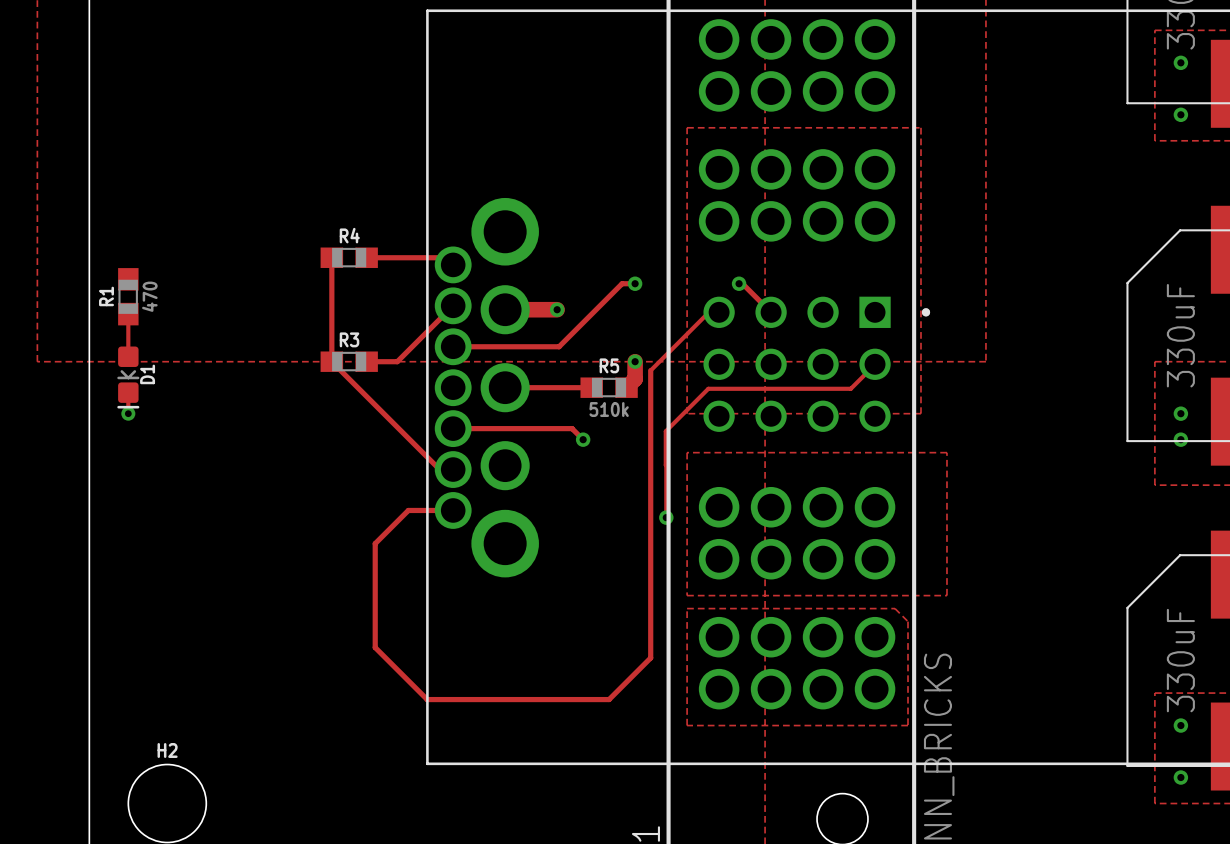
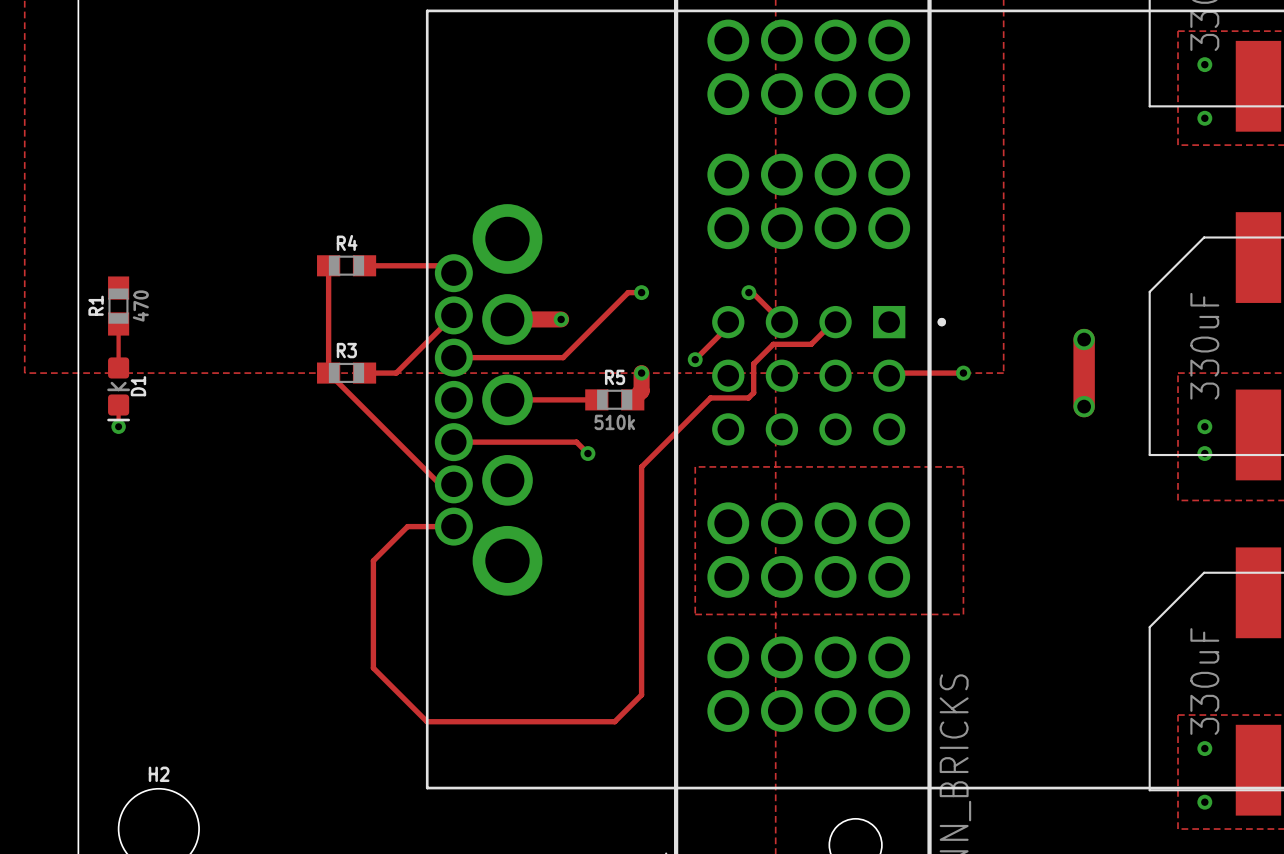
zone outline: (687, 127) (687, 413) (920, 413) (920, 127) (687, 127) -> none
track: none -> (728, 319) (728, 326) (695, 359)
track: (719, 312) (708, 312) (650, 370) (650, 657) (635, 673) -> (836, 319) (811, 344) (773, 344) (753, 363) (753, 392) (748, 397) (710, 397) (641, 466) (641, 694)
track: none -> (1084, 339) (1084, 406)
via: none -> (1084, 339)
via: none -> (695, 359)
track: none -> (889, 373) (963, 373)
via: none -> (963, 373)
track: (872, 366) (850, 388) (708, 388) (665, 431) (666, 517) -> none
via: none -> (1084, 406)
via: (666, 517) -> none
zone outline: (687, 608) (687, 725) (908, 725) (908, 621) (895, 608) (687, 608) -> none

